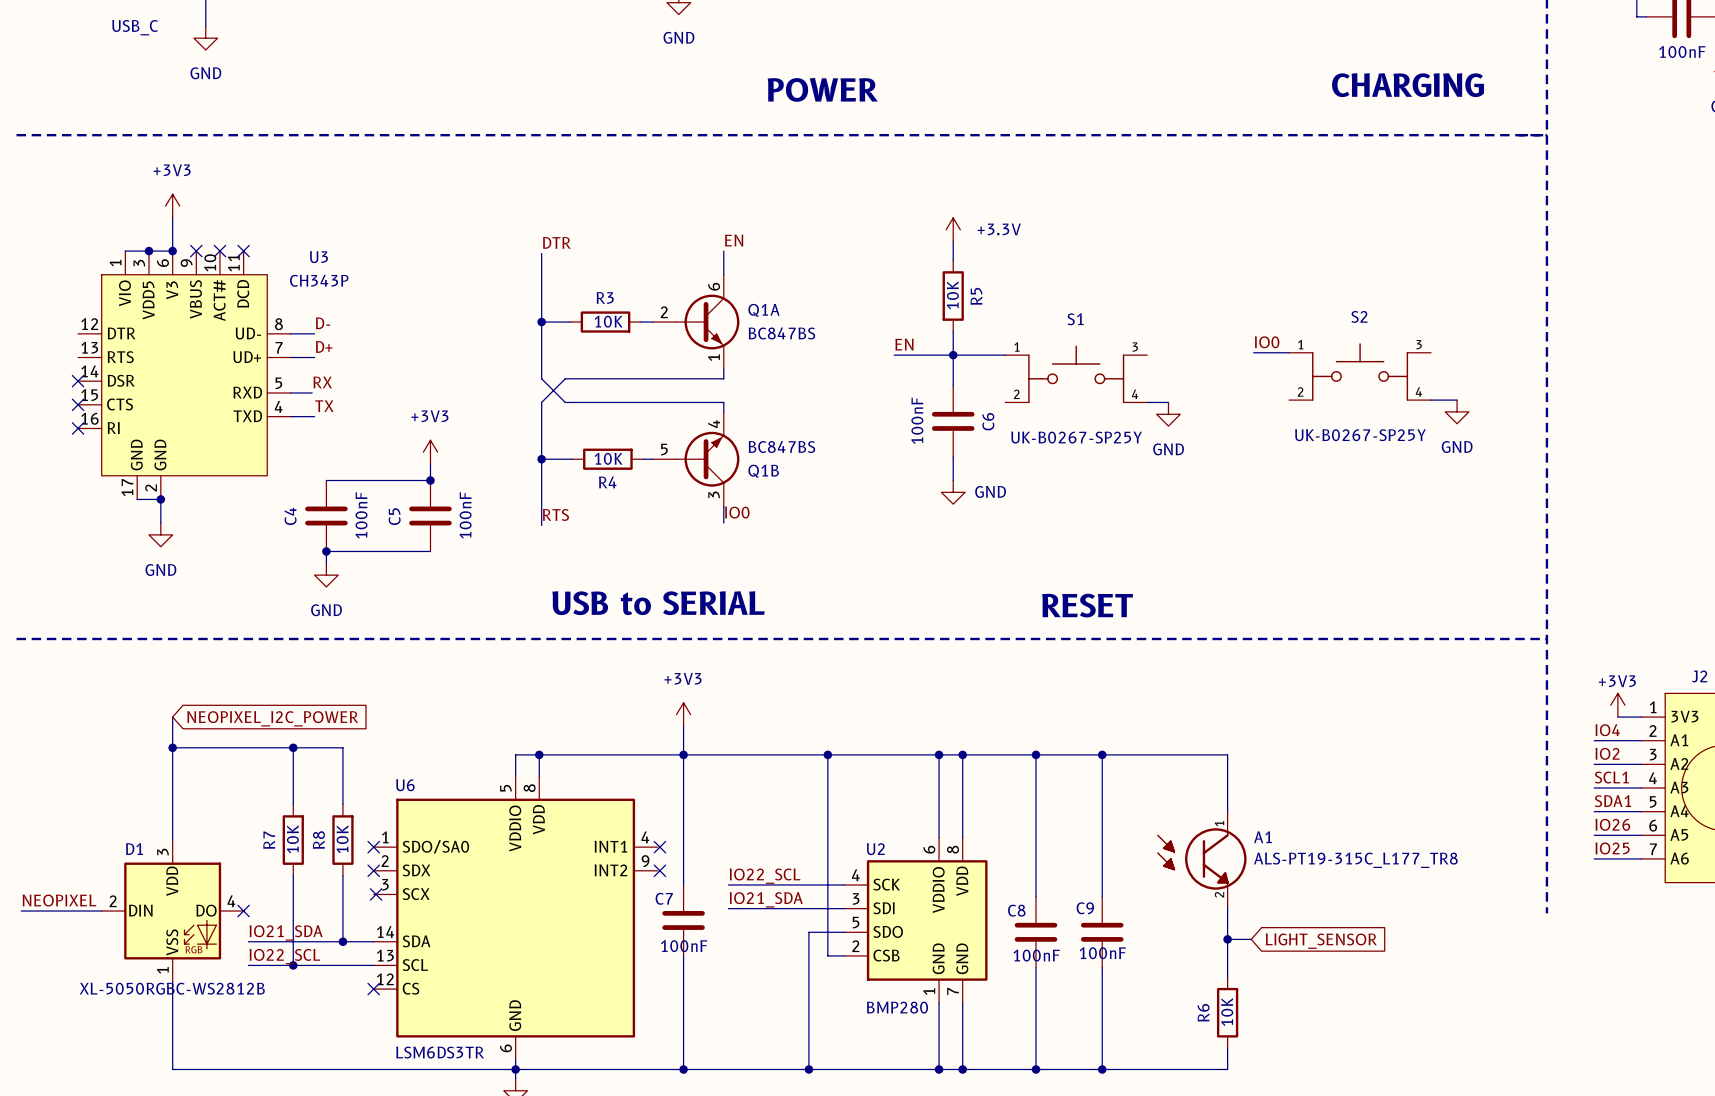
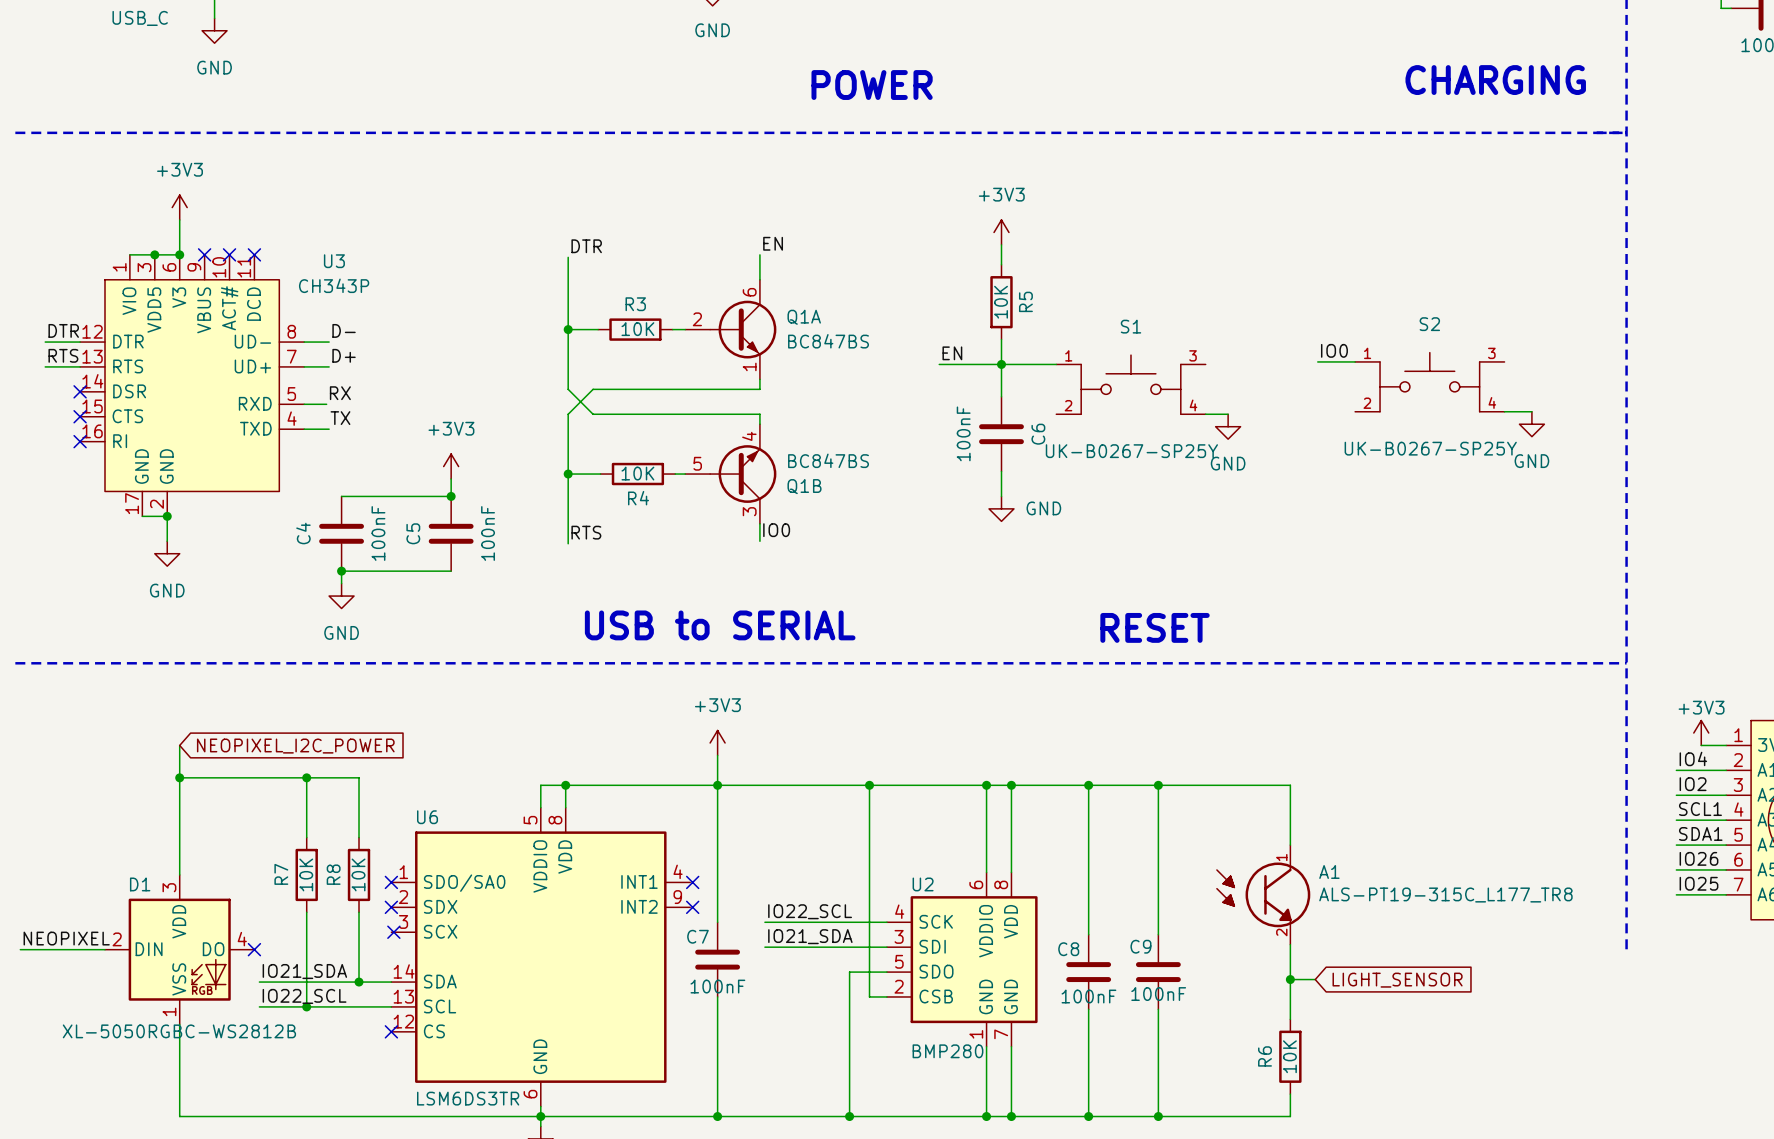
power symbol: +3.3V (953, 229) -> +3V3 (1001, 232)
label: none -> DTR (63, 330)
wire: none -> (45, 342) (80, 342)
label: none -> RTS (63, 355)
wire: none -> (45, 366) (80, 366)

